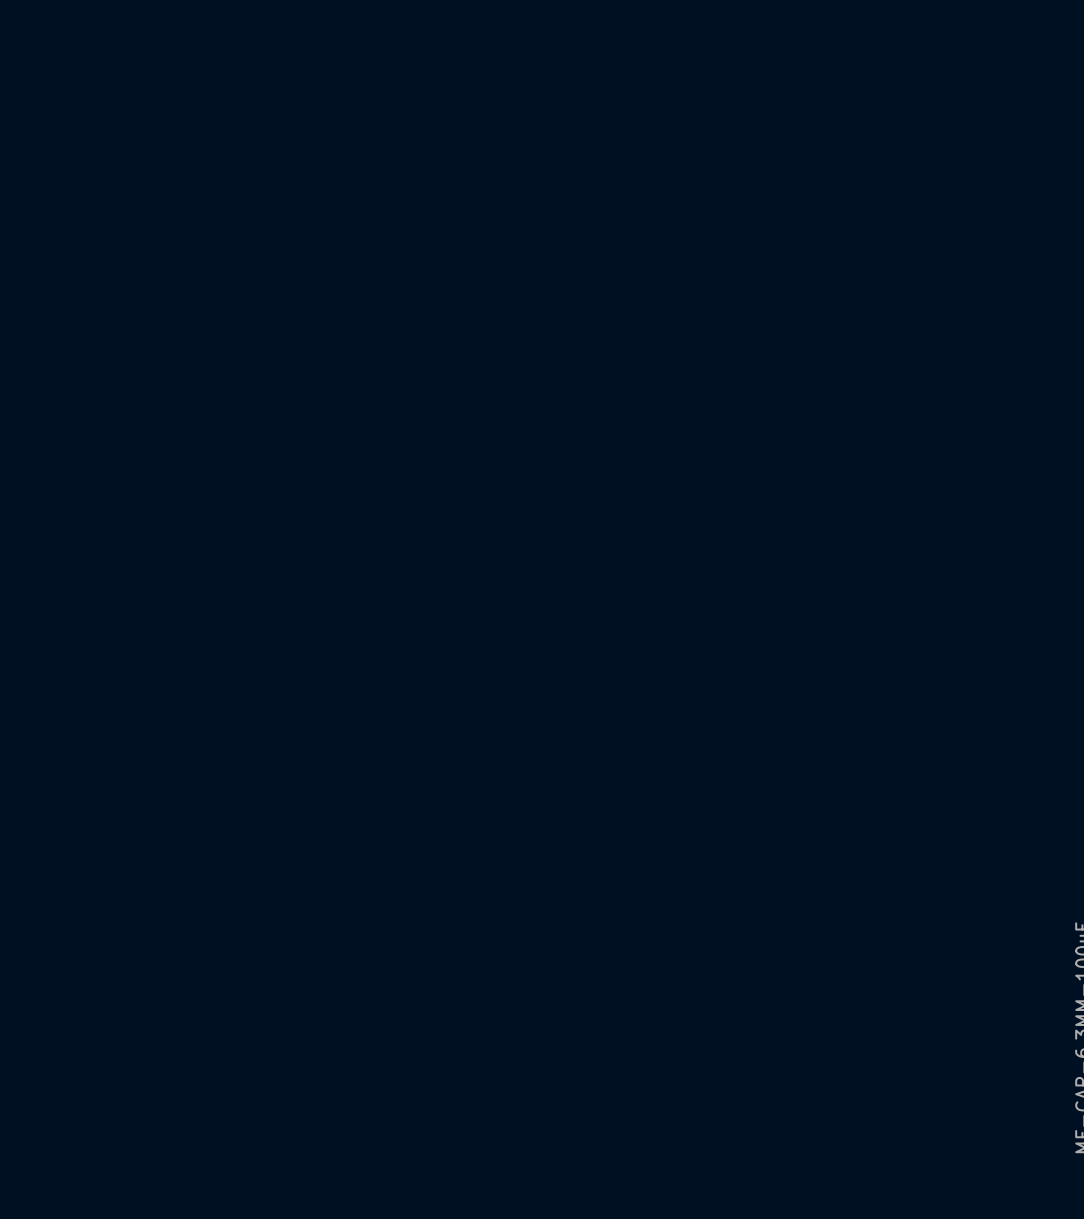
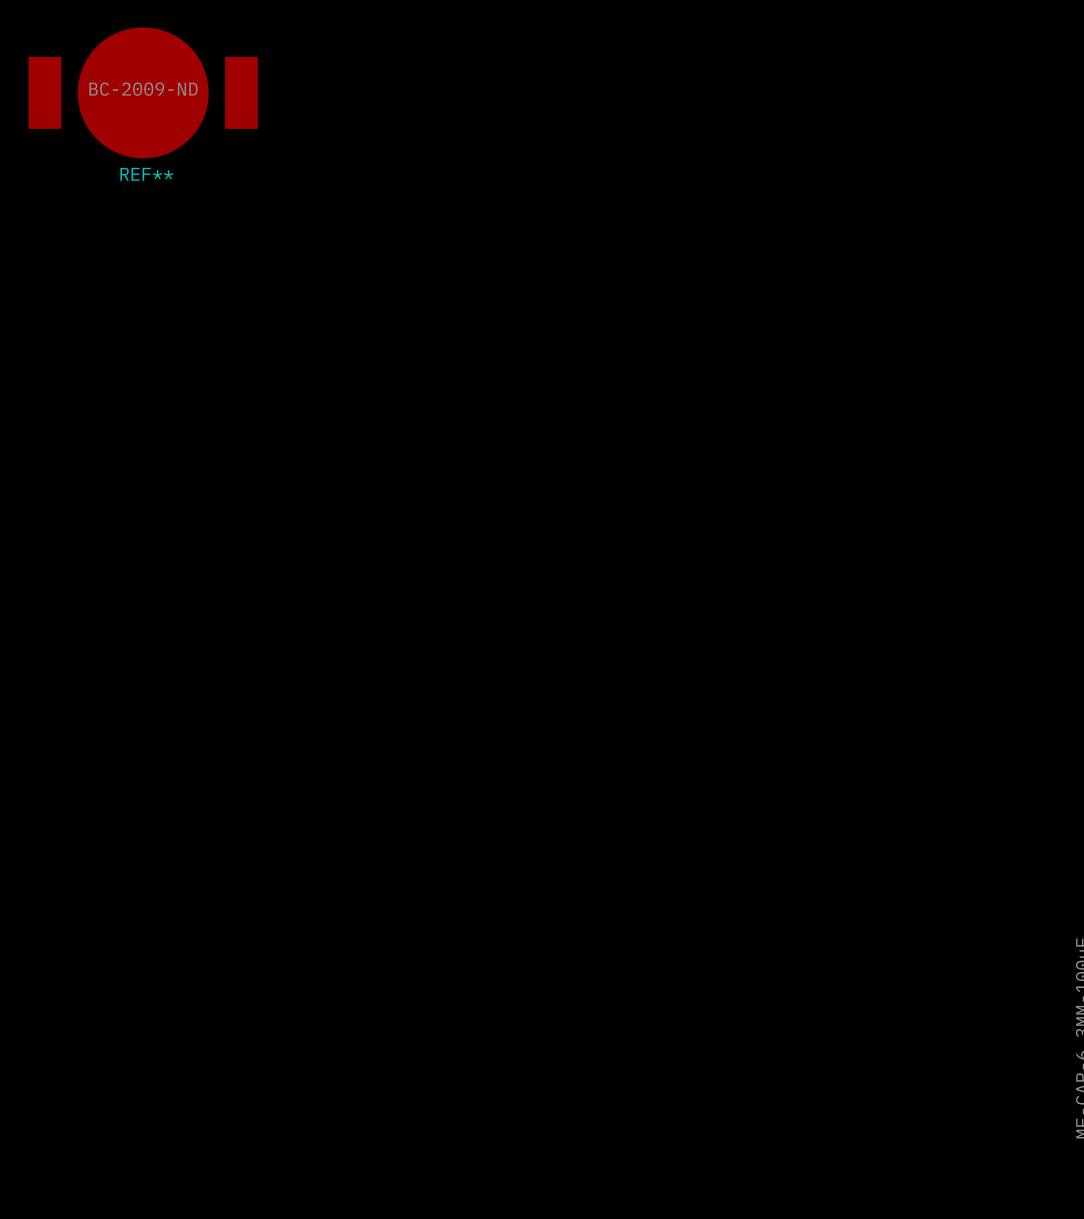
REF**: none -> BC-2009-ND (143, 92)

